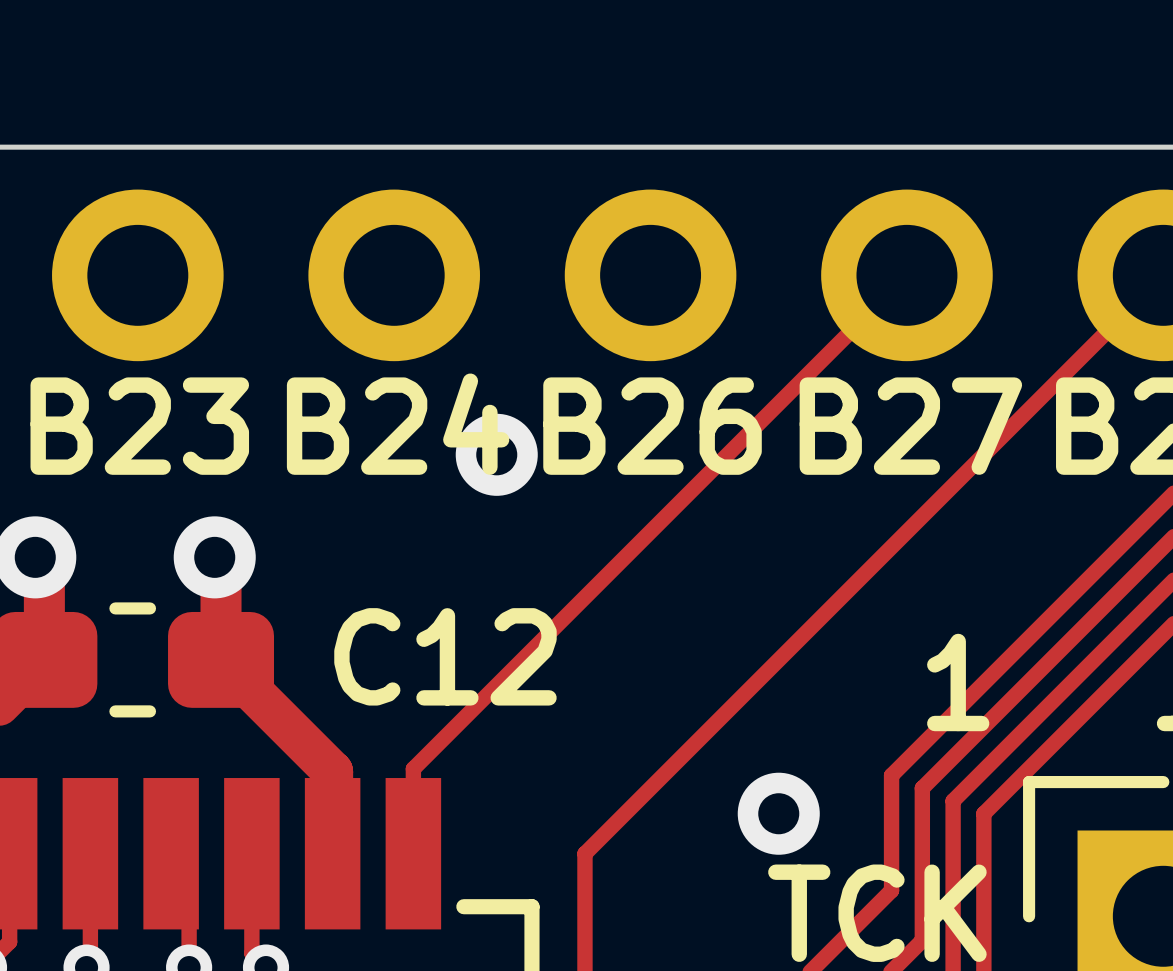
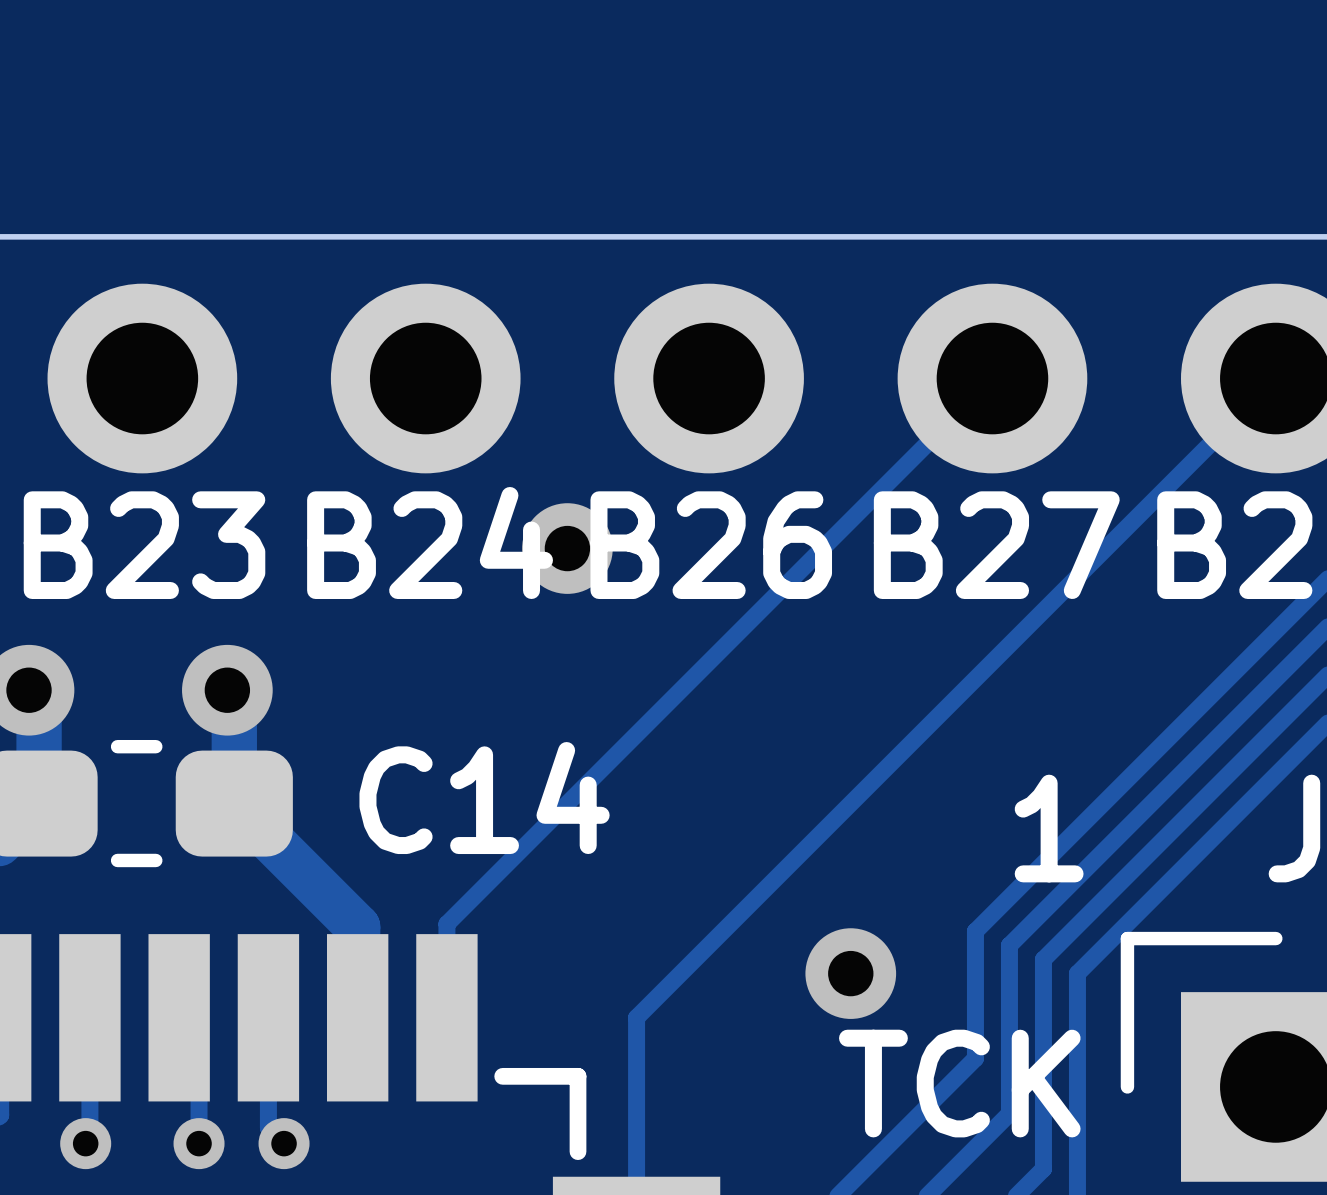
via position: (496, 454) -> (567, 548)
C12 name: C12 (445, 656) -> C14 (484, 798)

